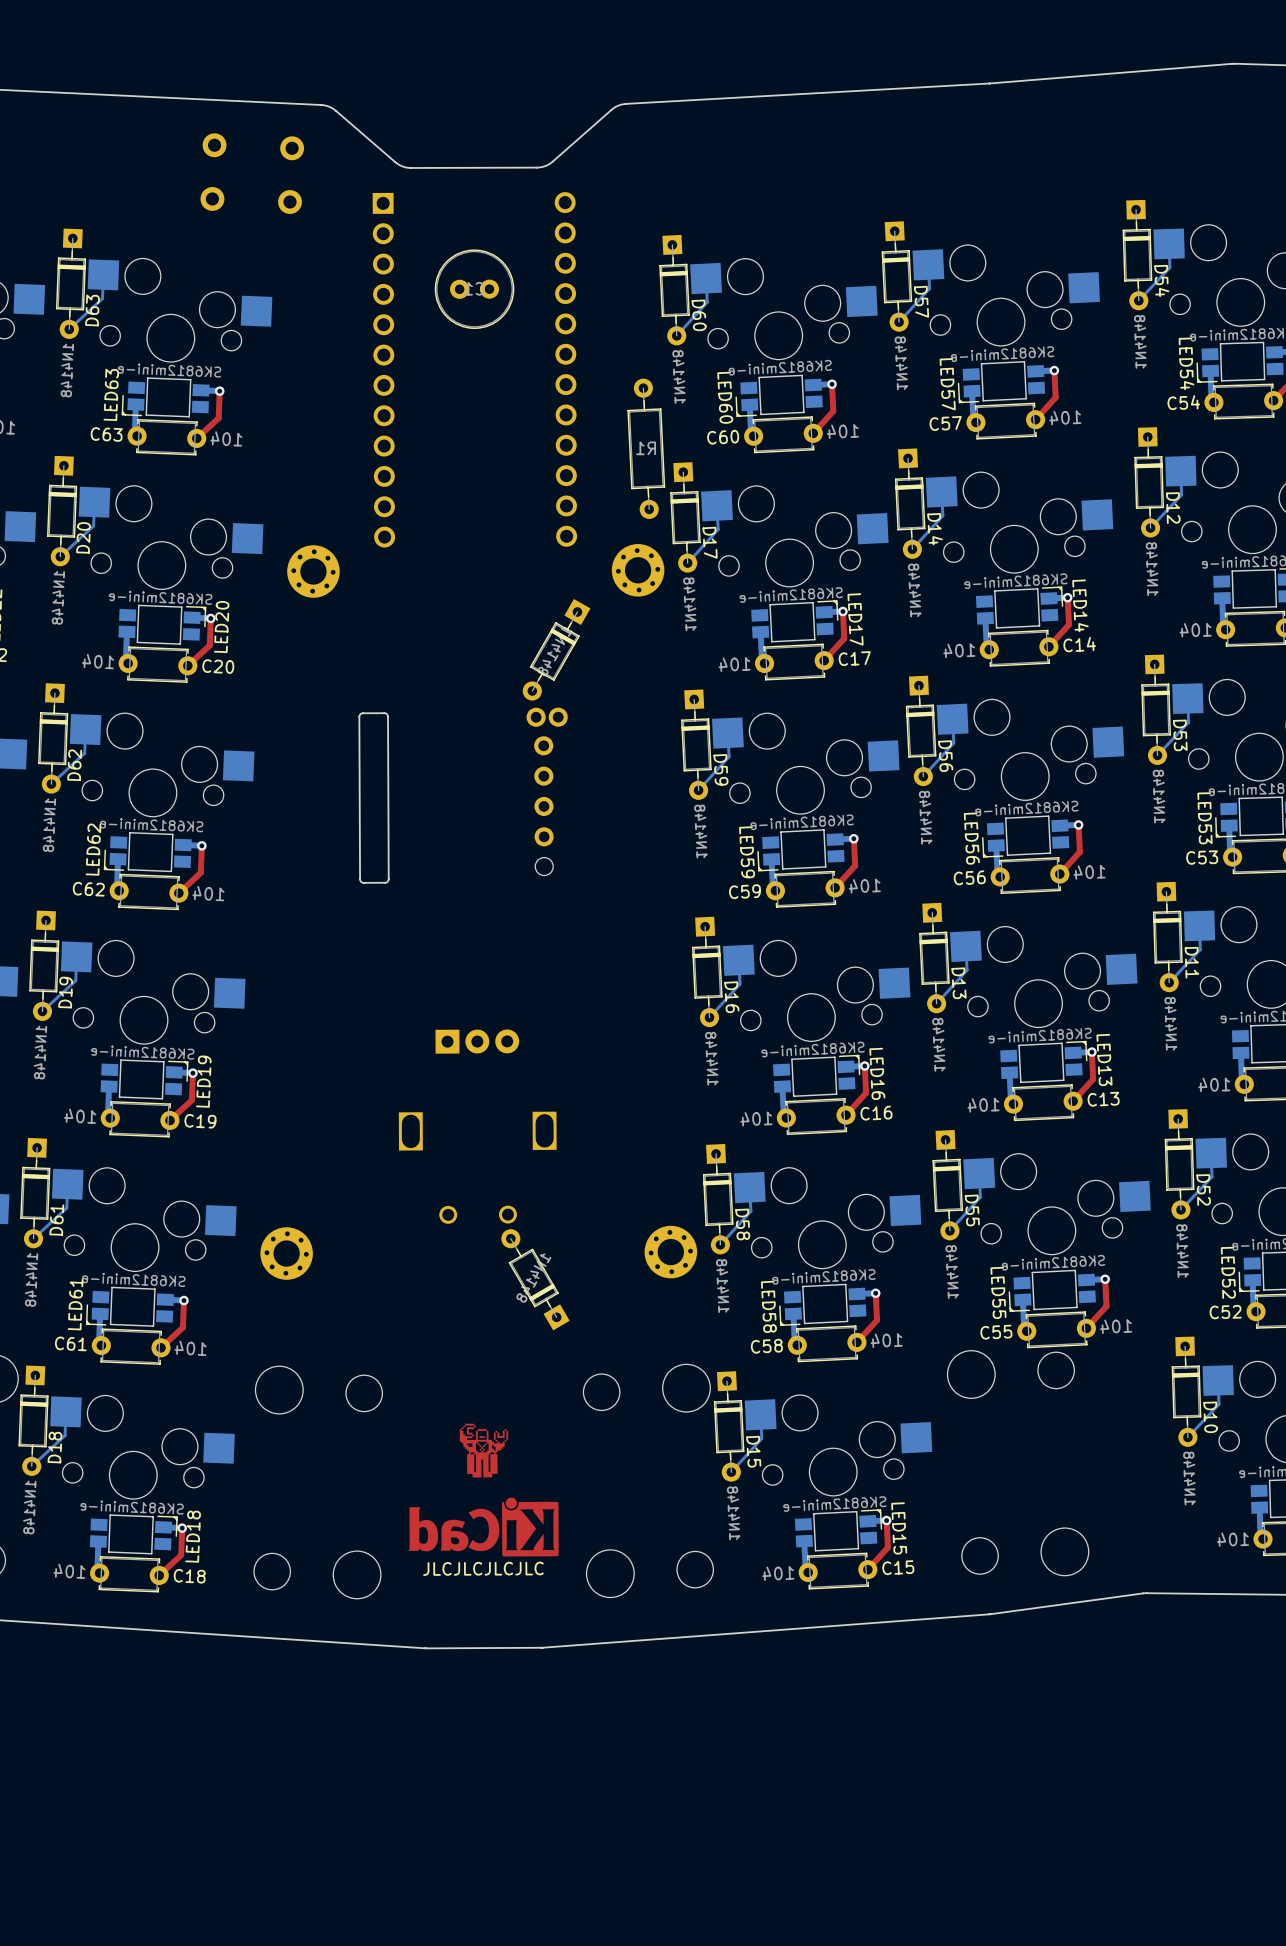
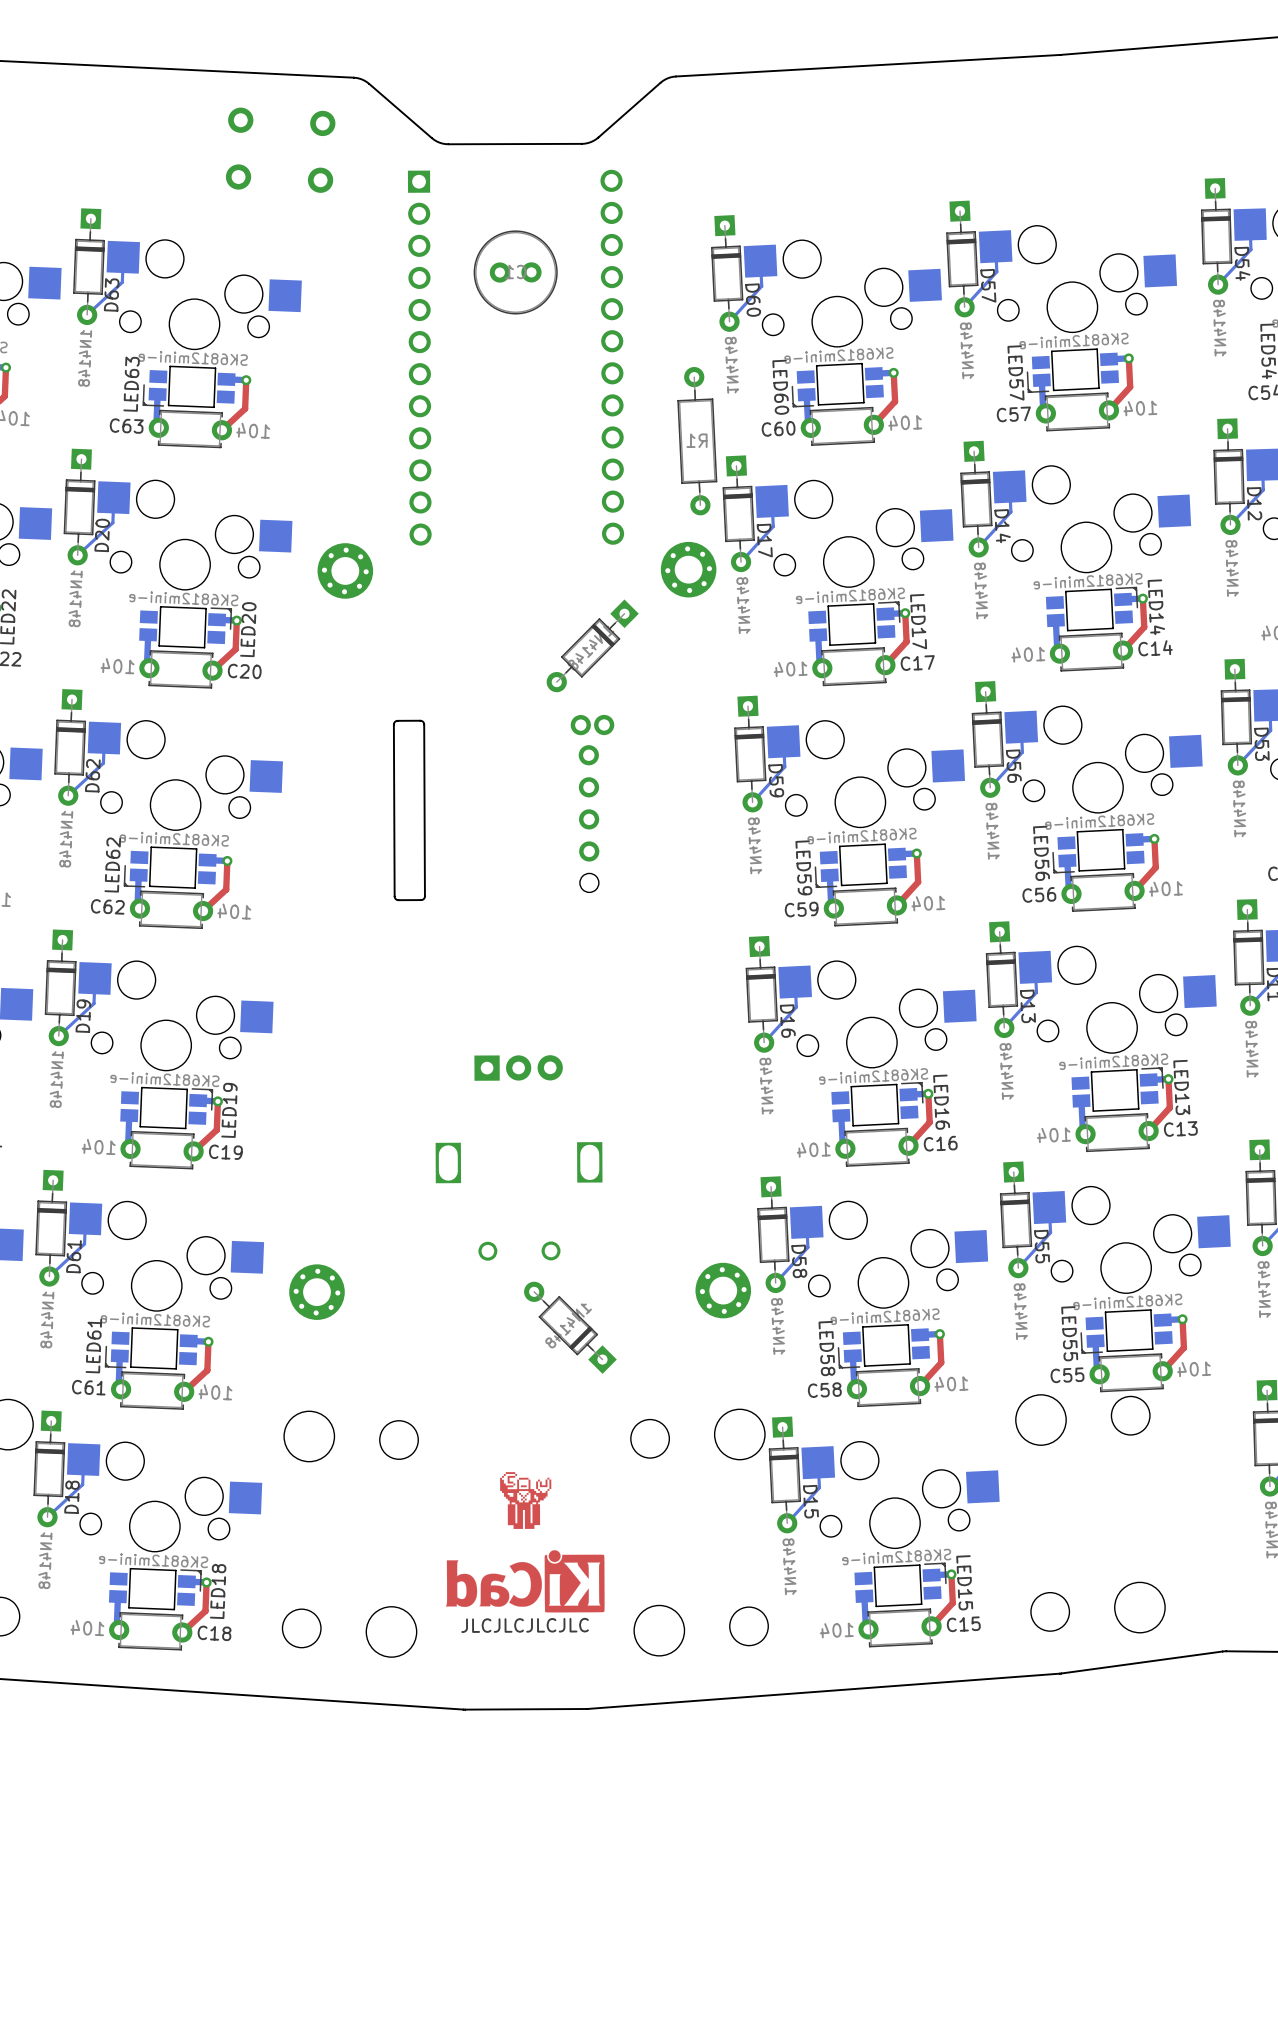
part rotation: 0° (556, 649) -> 15° clockwise (592, 645)
part rotation: 0° (535, 1279) -> 15° counterclockwise (570, 1327)

